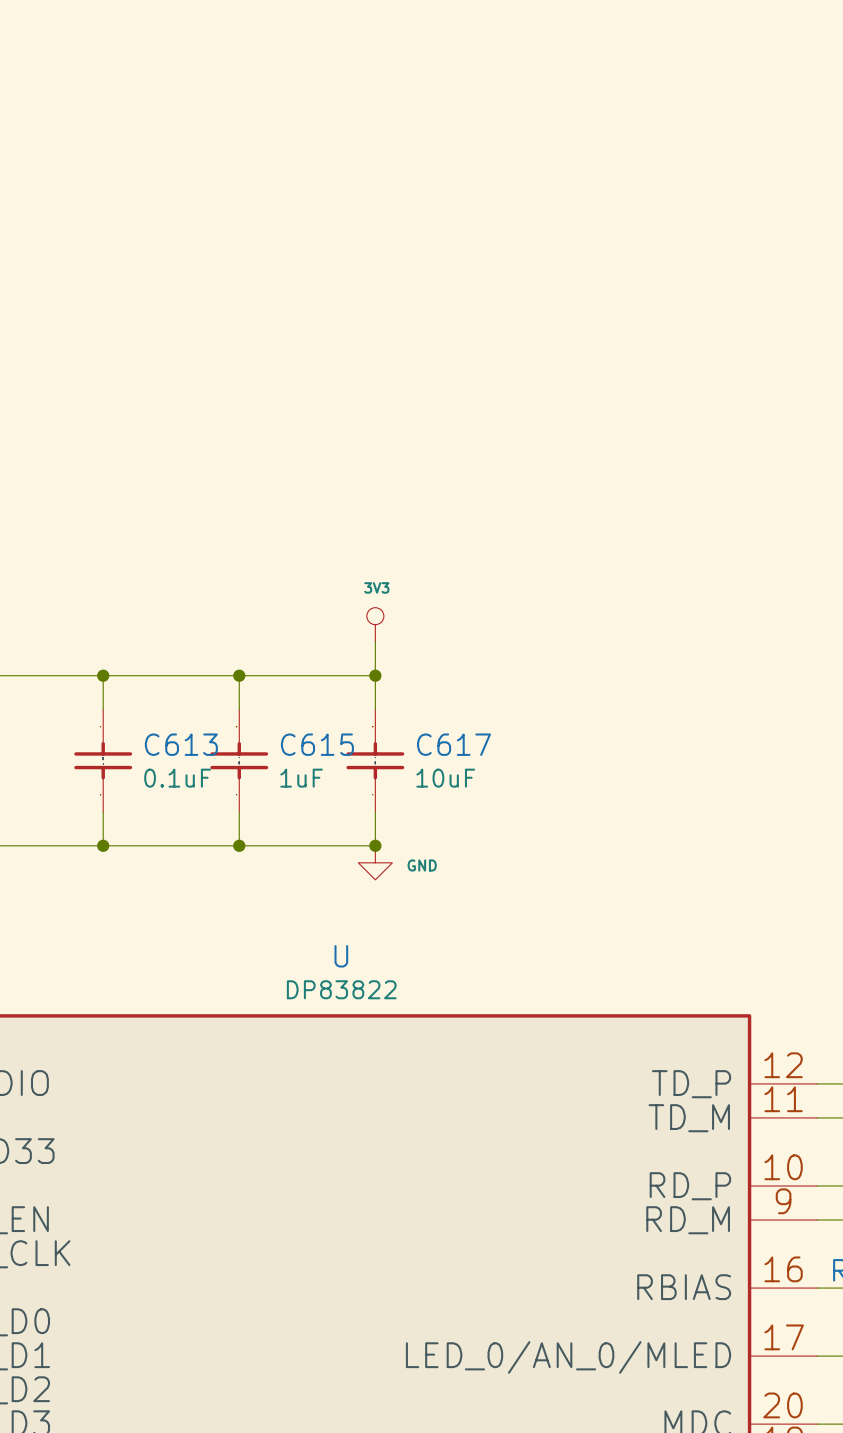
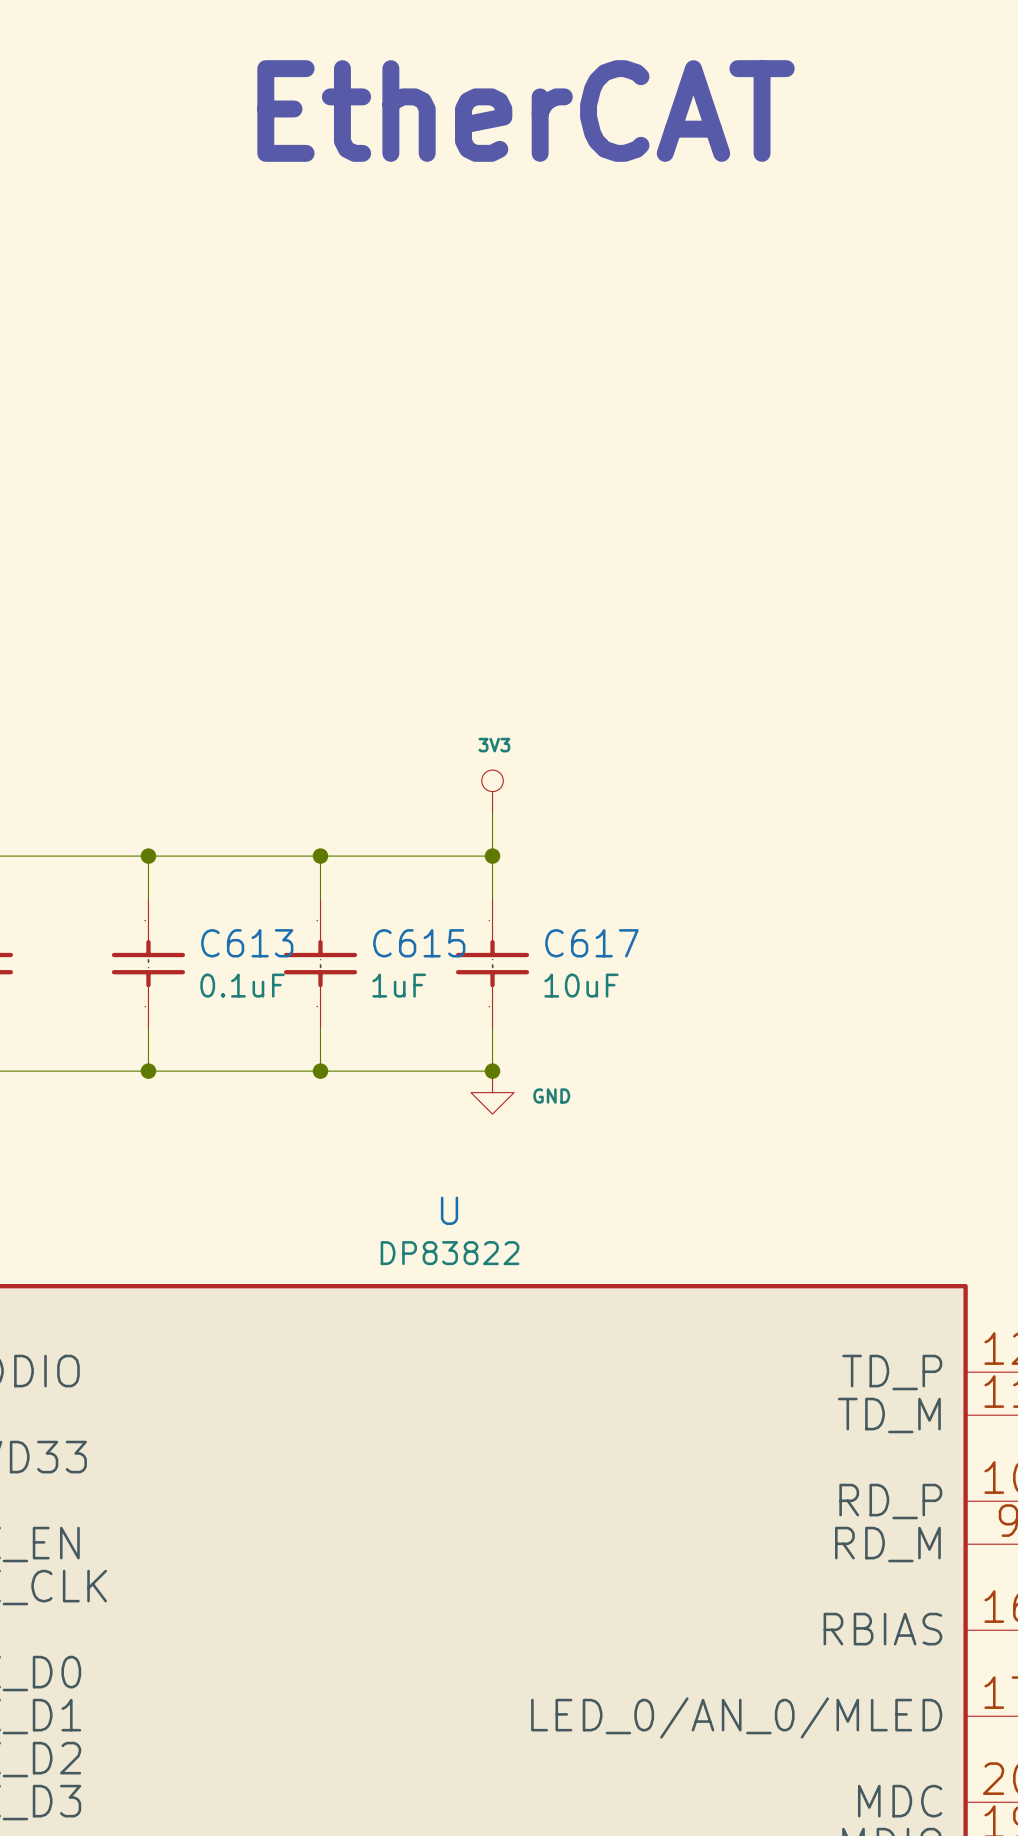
text: none -> EtherCAT (526, 111)

